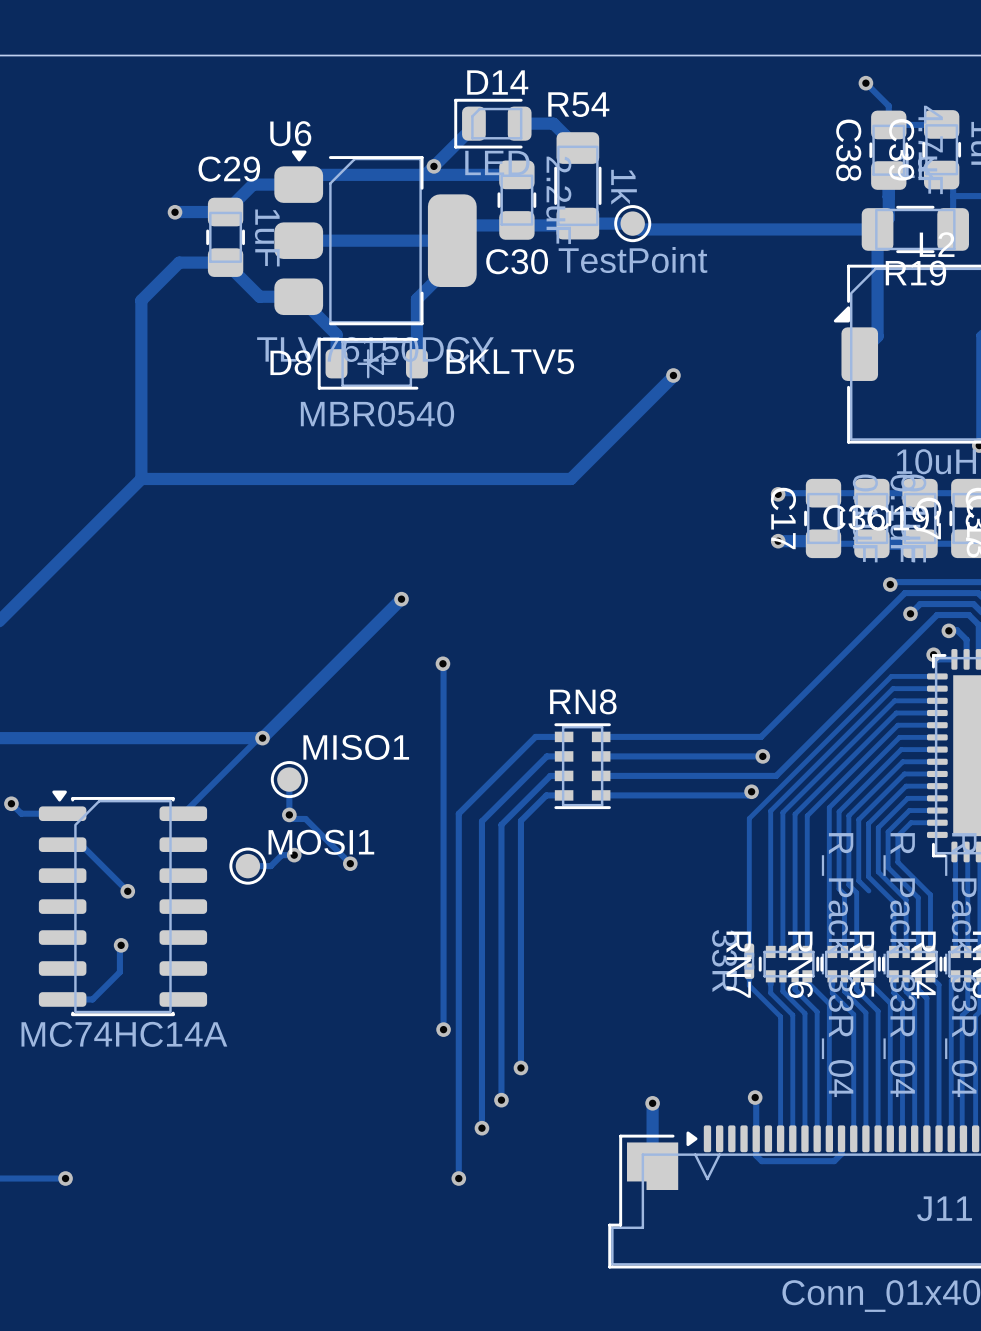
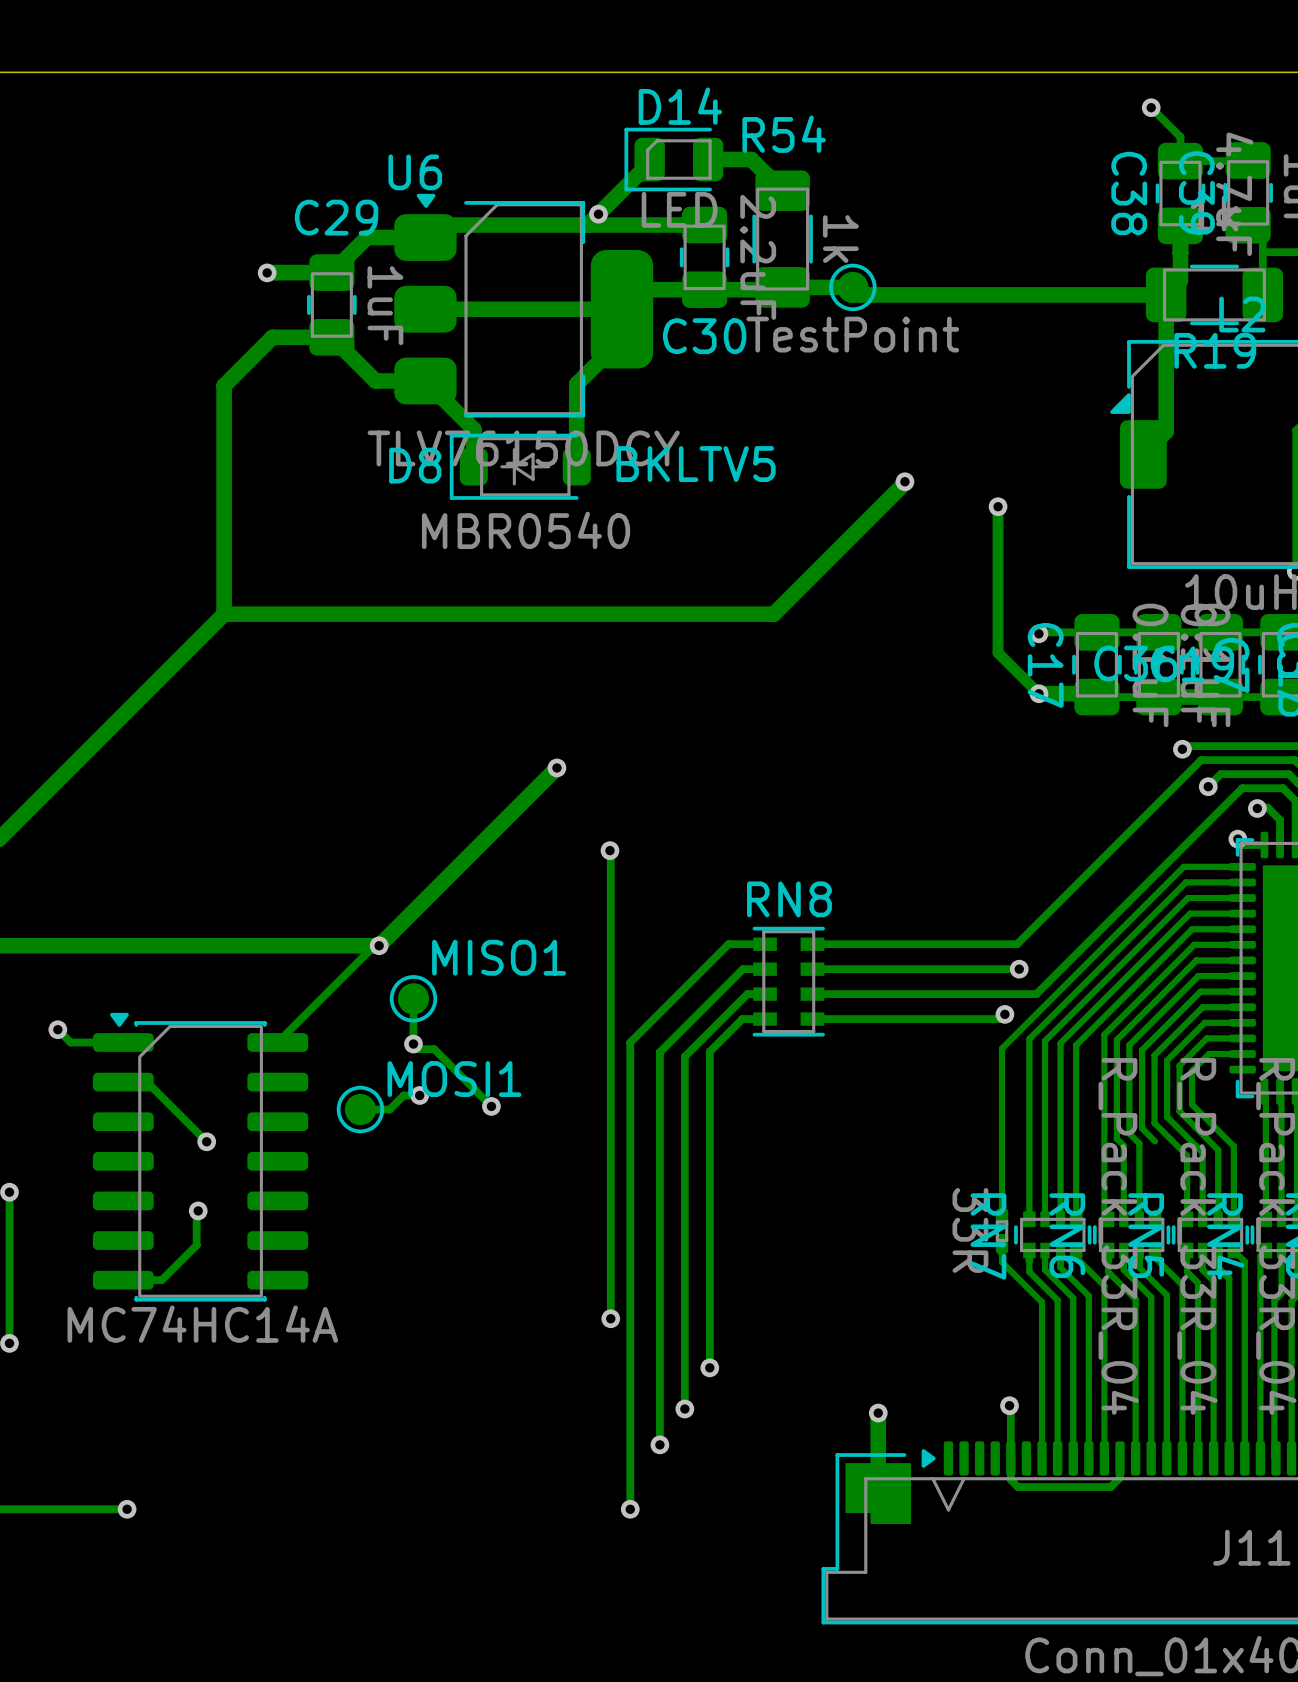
track: none -> (998, 506) (998, 652) (1038, 693)
via: none -> (998, 506)

